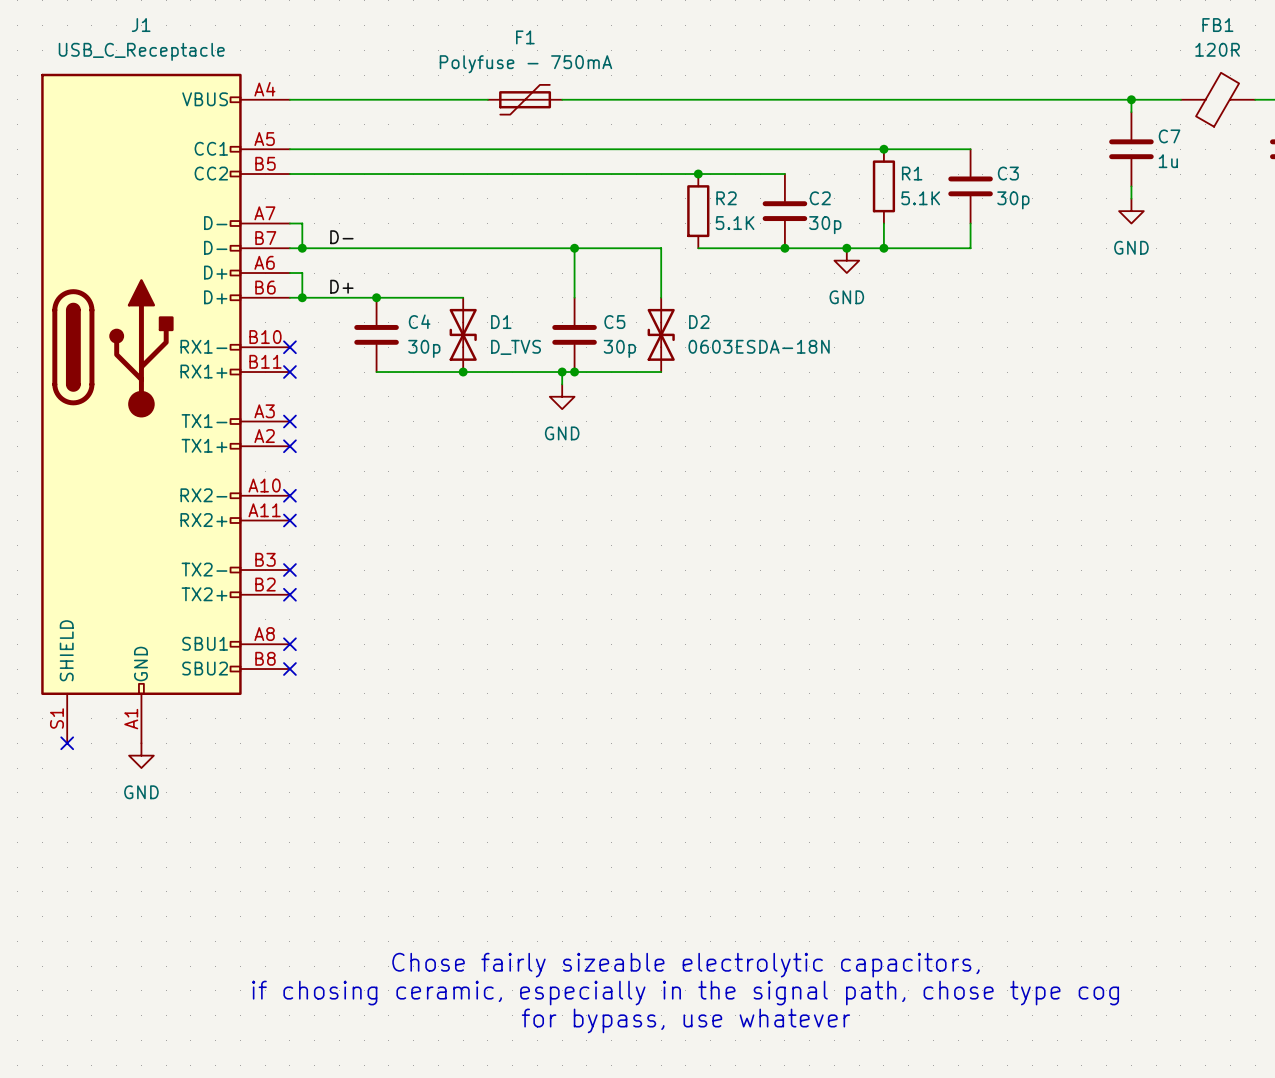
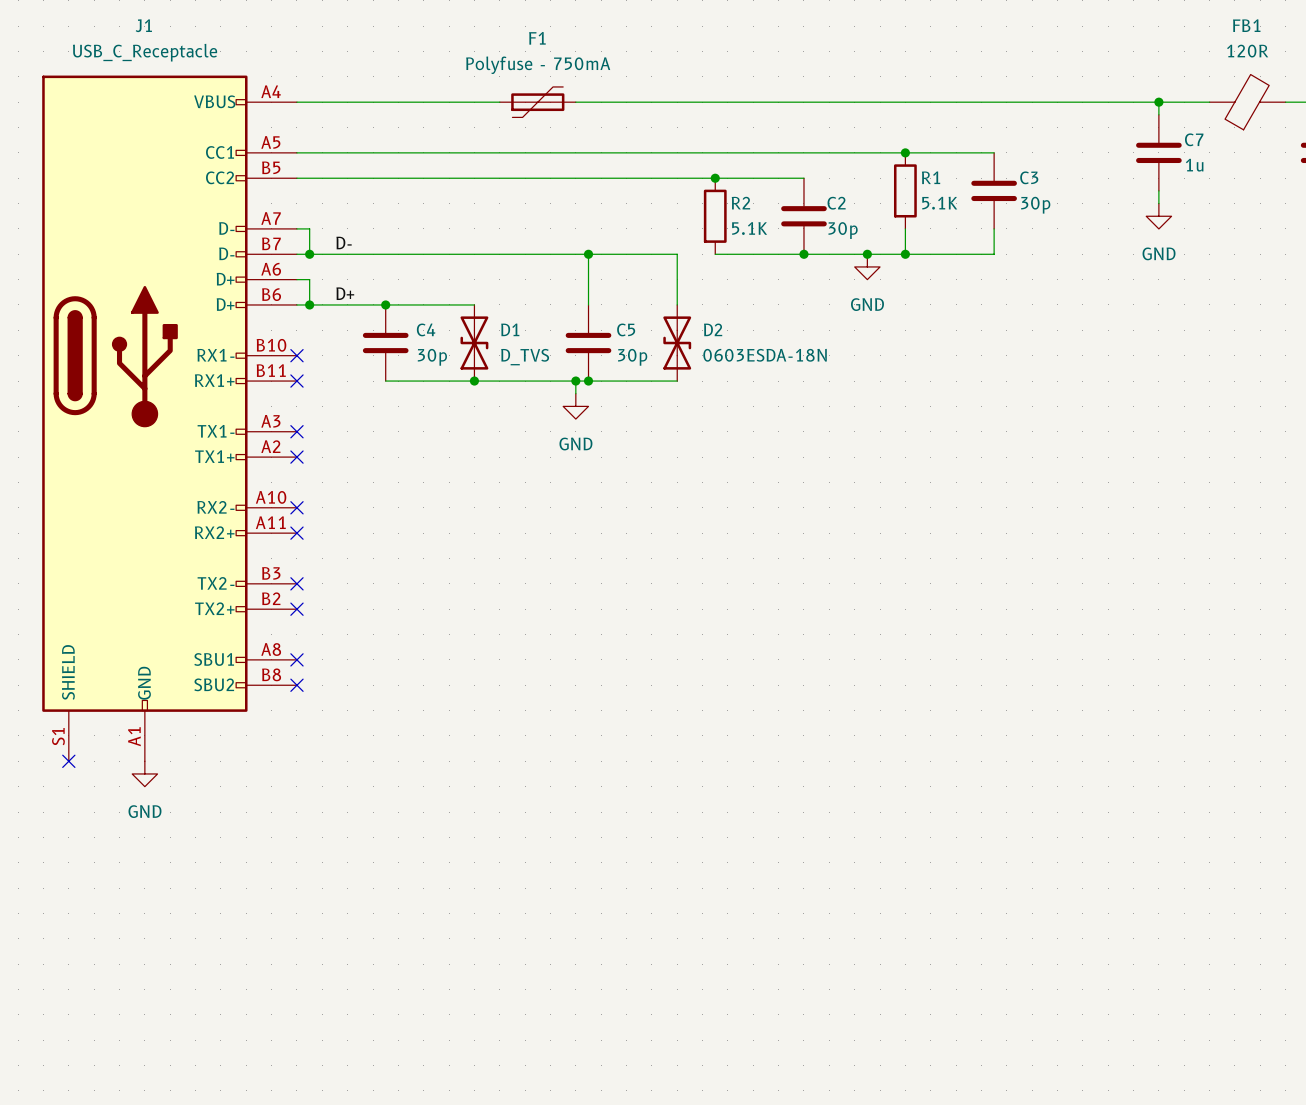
text: Chose fairly sizeable electrolytic capacitors, (685, 965) -> none
text: if chosing ceramic, especially in the signal path, chose type cog (685, 993) -> none
text: for bypass, use whatever (685, 1020) -> none

